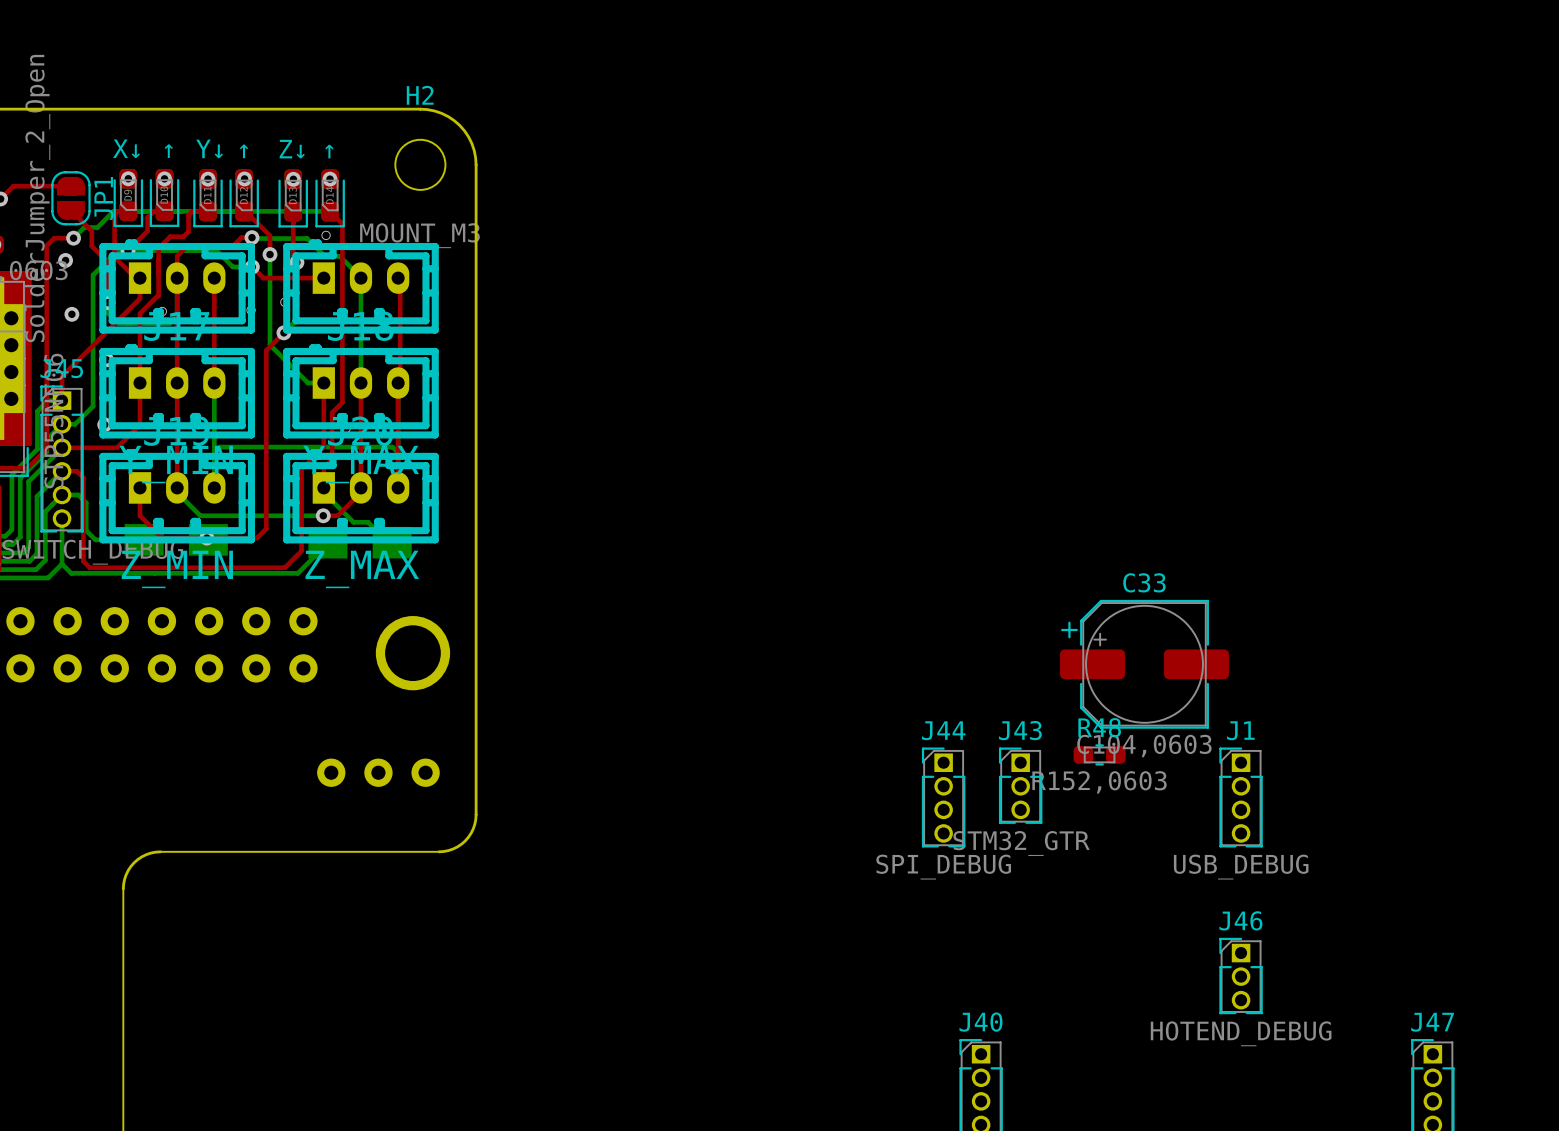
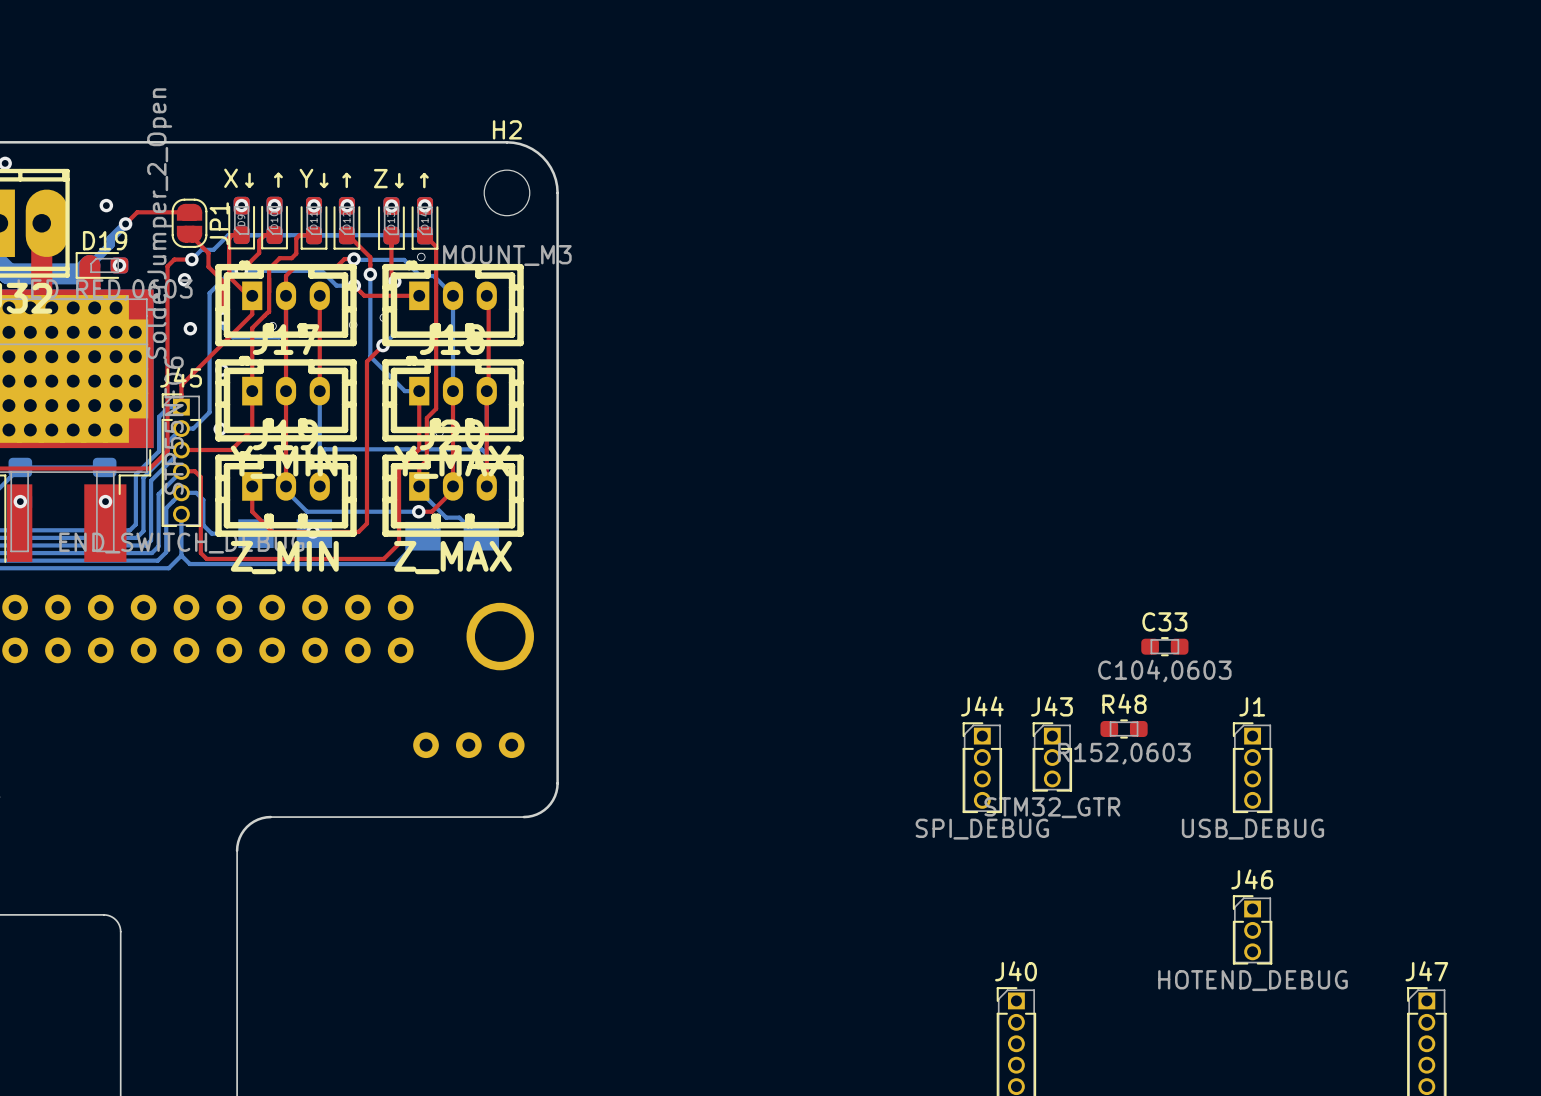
C33 name position: C33 (1144, 582) -> C33 (1164, 621)
C33 footprint: [1060, 599, 1229, 729] -> [1141, 637, 1189, 657]
C33 value position: C104,0603 (1144, 745) -> C104,0603 (1164, 670)

